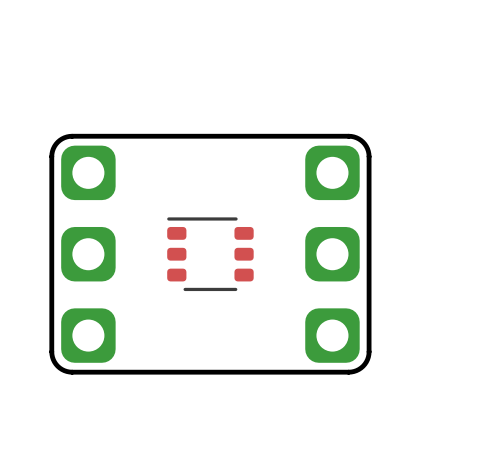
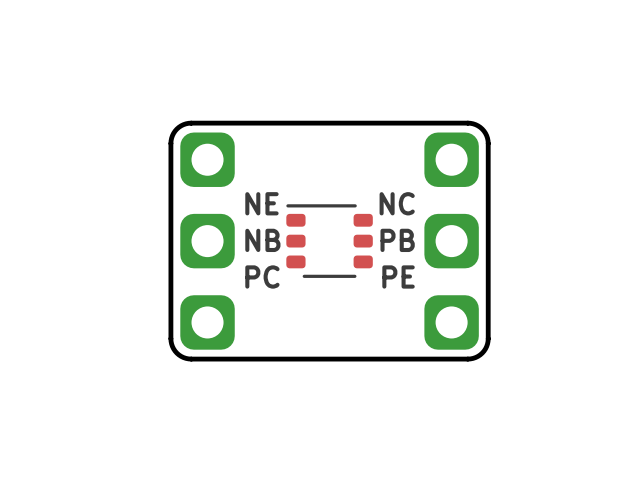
text: none -> NE (261, 203)
text: none -> NC (397, 203)
text: none -> NB (262, 240)
text: none -> PB (397, 240)
text: none -> PC (262, 276)
text: none -> PE (398, 276)

